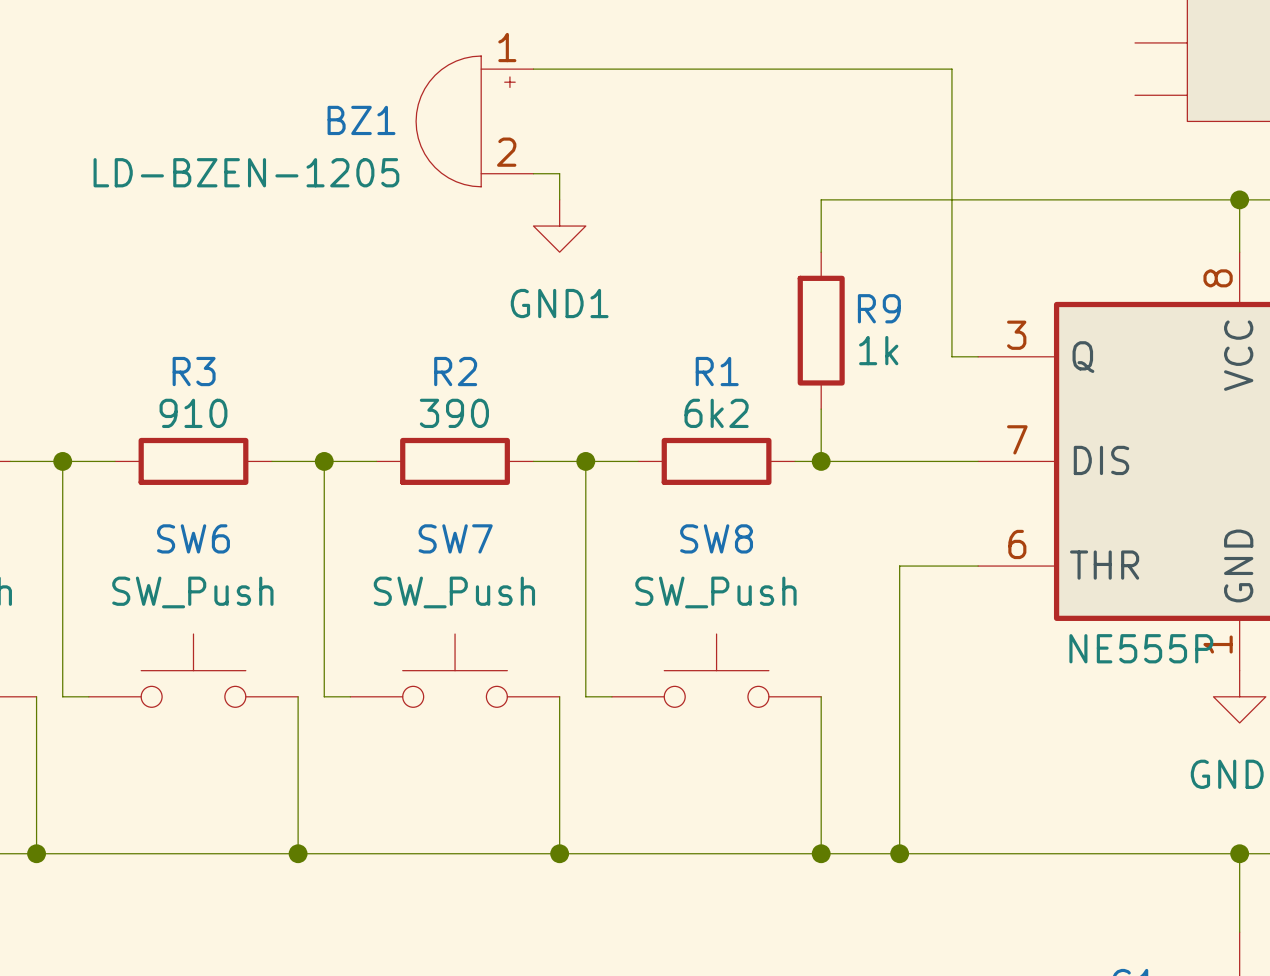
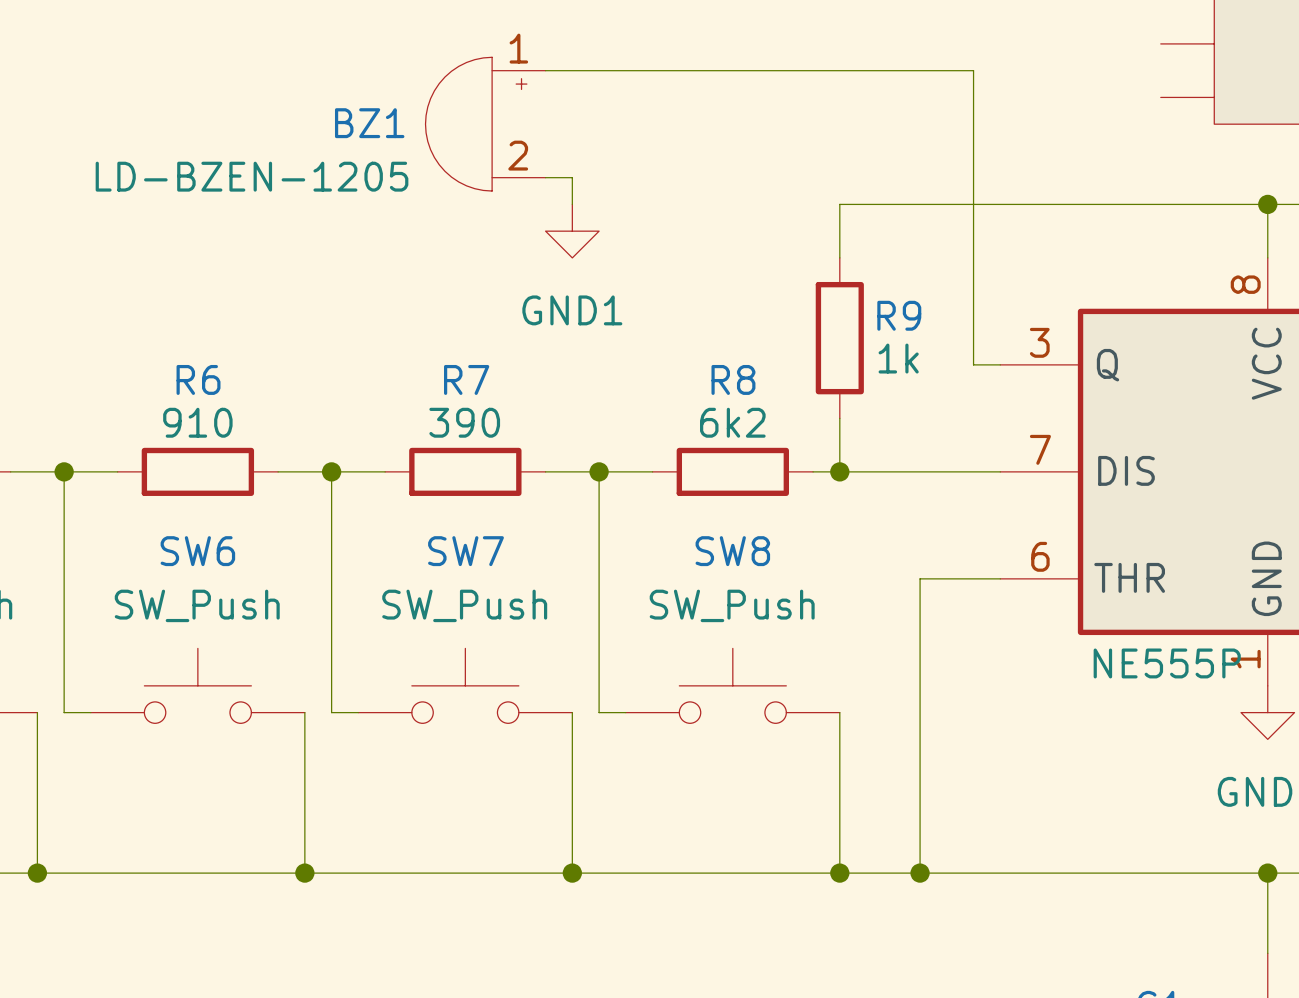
R3 name: R3 (194, 371) -> R6 (198, 379)
R2 name: R2 (455, 371) -> R7 (466, 379)
R1 name: R1 (717, 371) -> R8 (733, 379)

